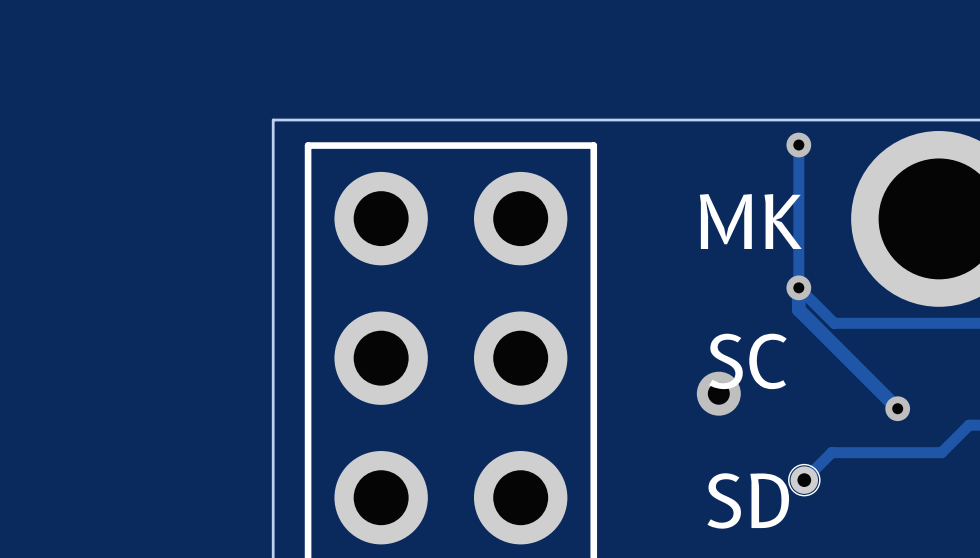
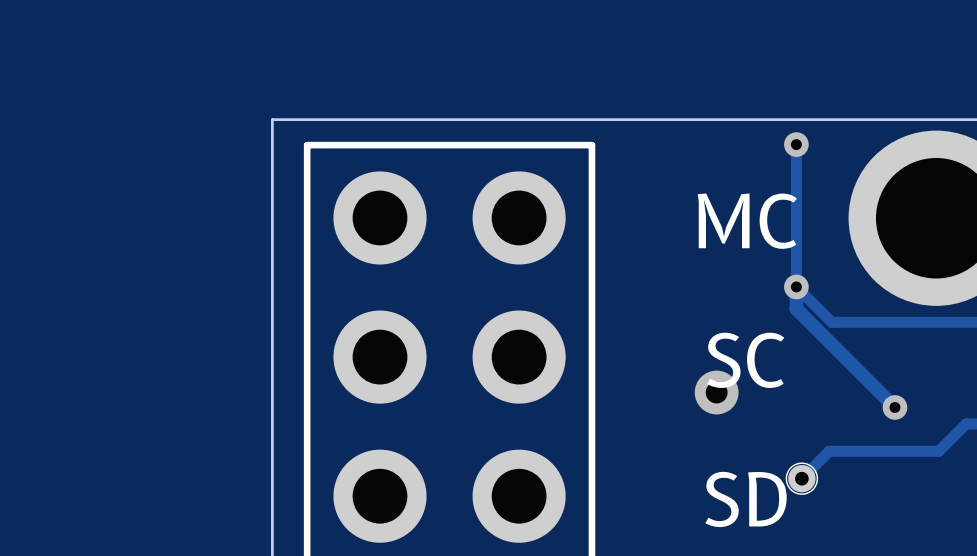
part text: MK (750, 221) -> MC (747, 221)

